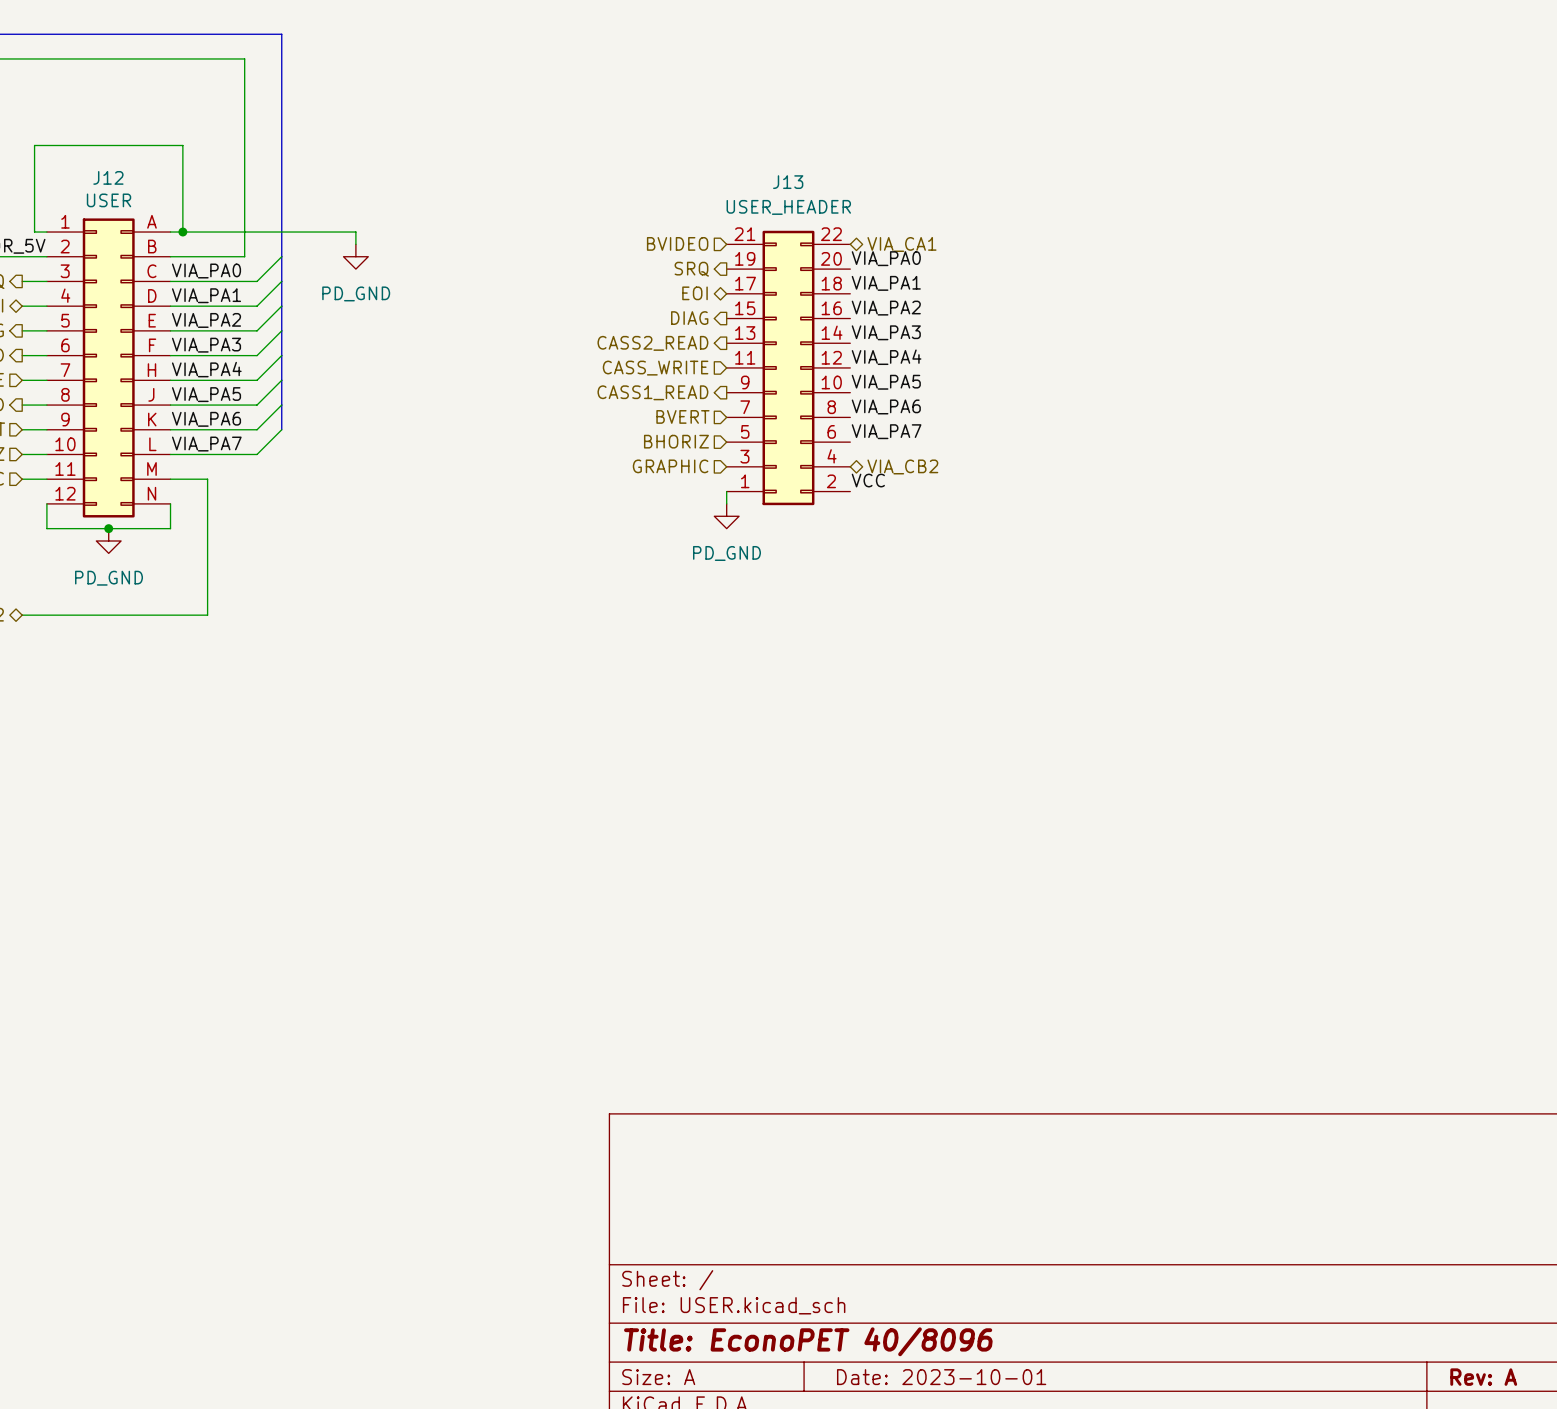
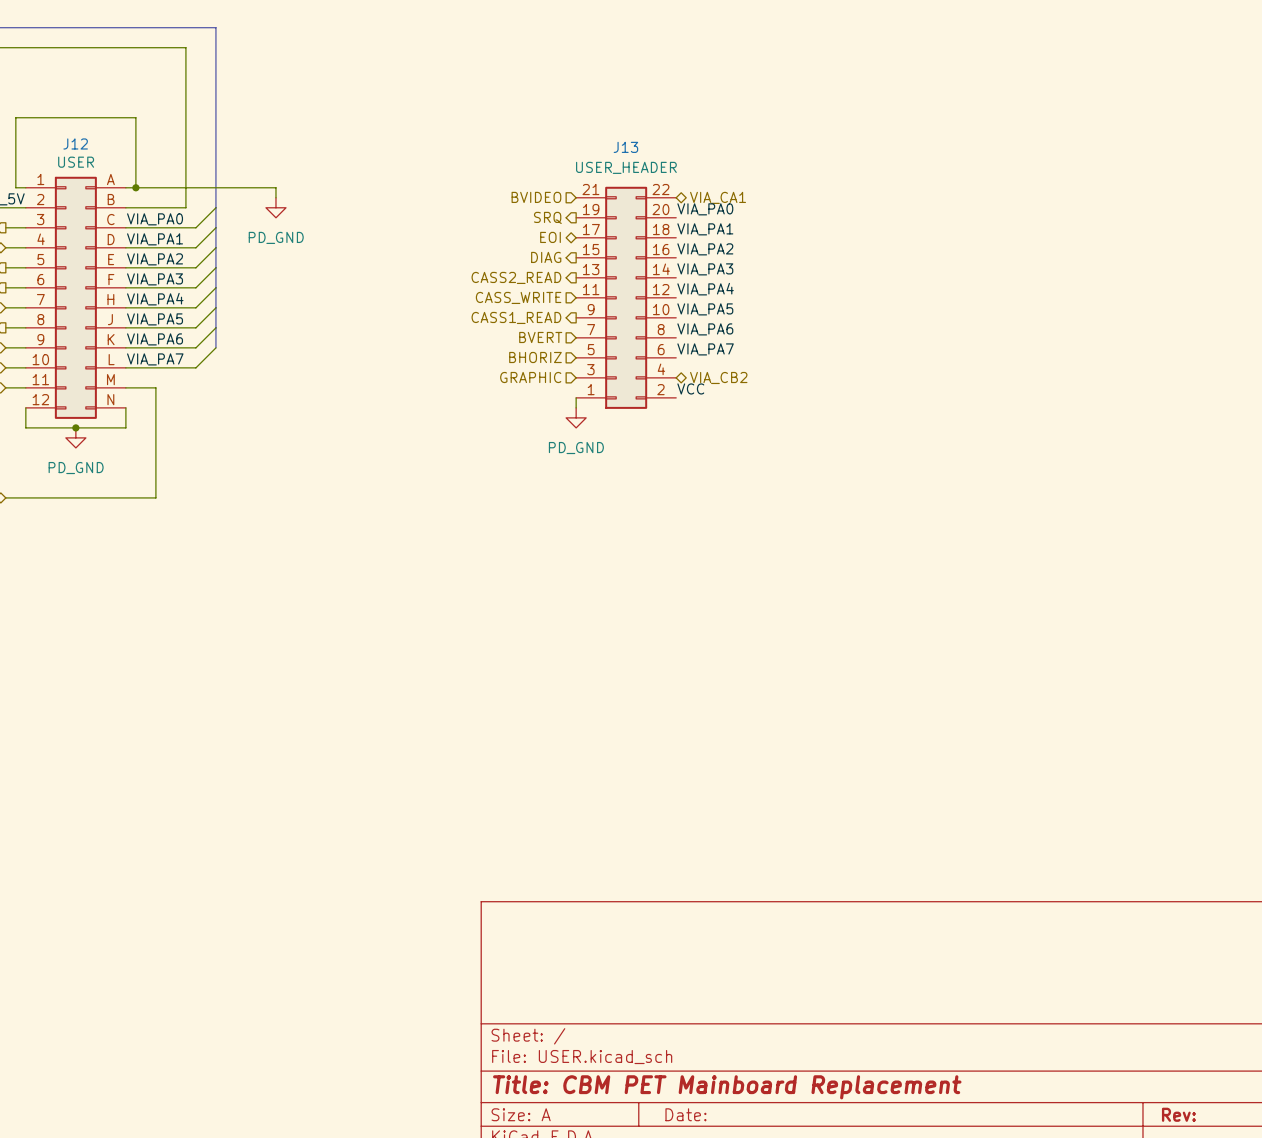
title block: Title: EconoPET 40/8096 (808, 1341) -> Title: CBM PET Mainboard Replacement (727, 1087)
title block: Date: 2023-10-01 (941, 1377) -> Date: (685, 1114)
title block: Rev: A (1483, 1377) -> Rev: (1178, 1114)

